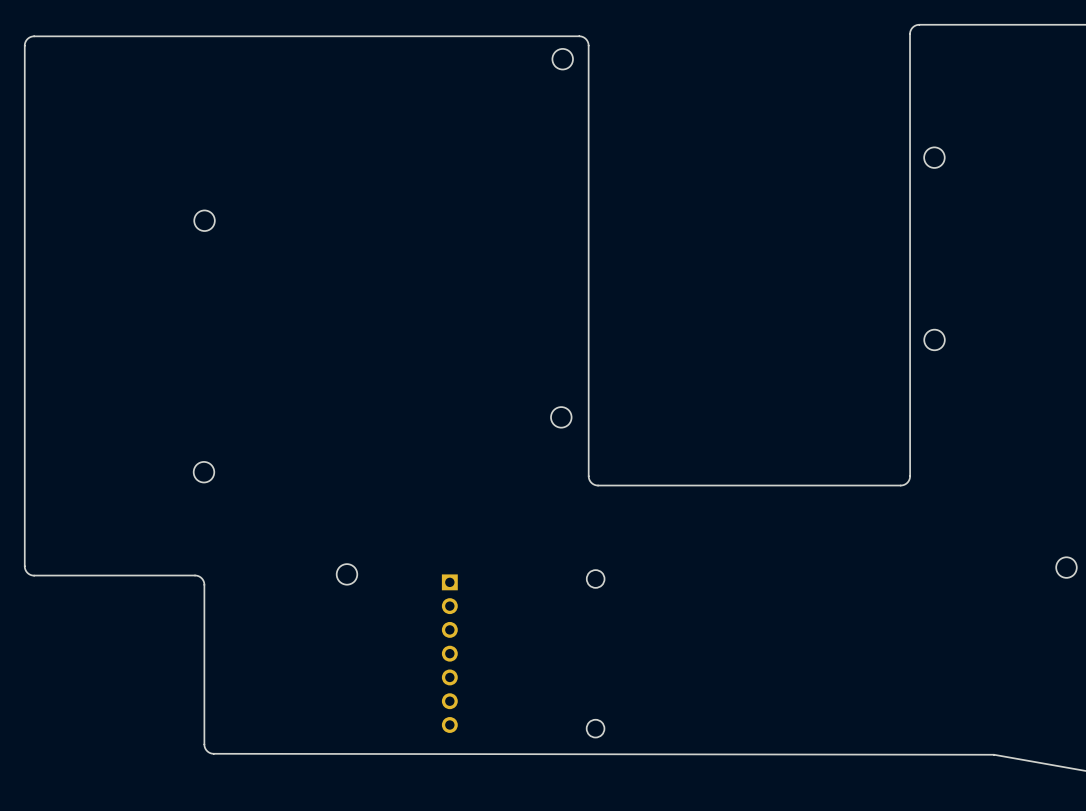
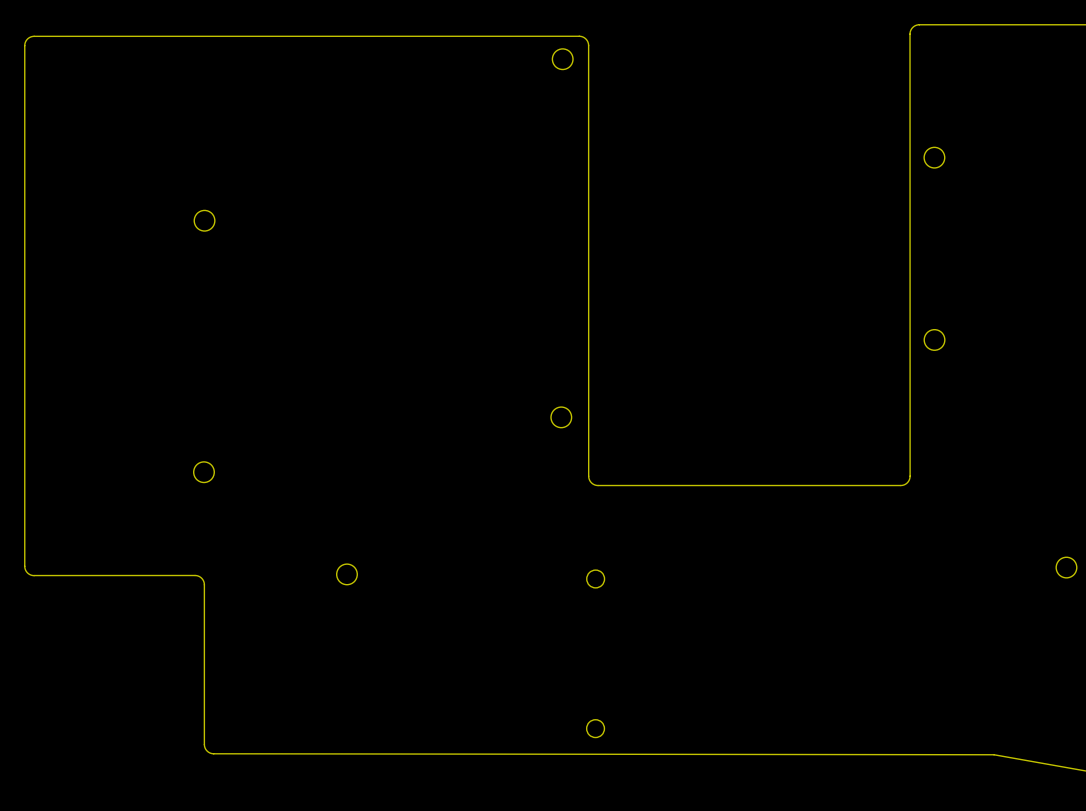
part: (449, 653) -> none

